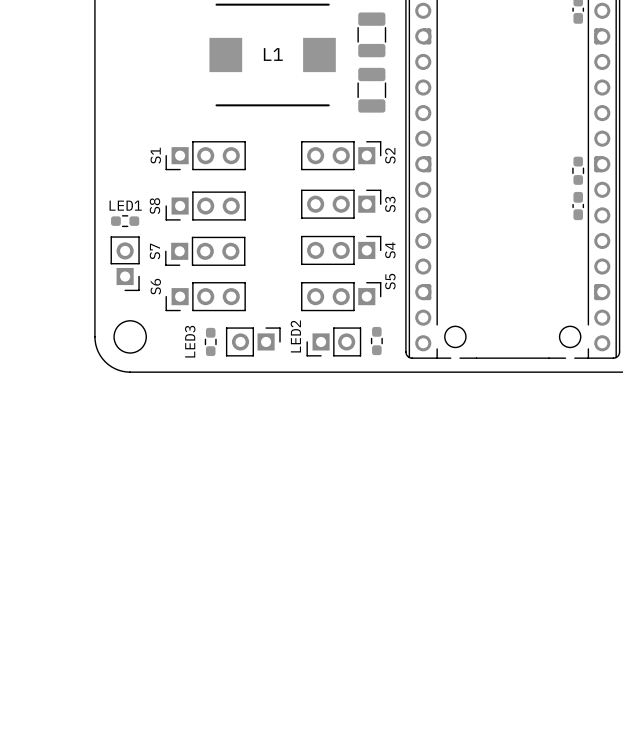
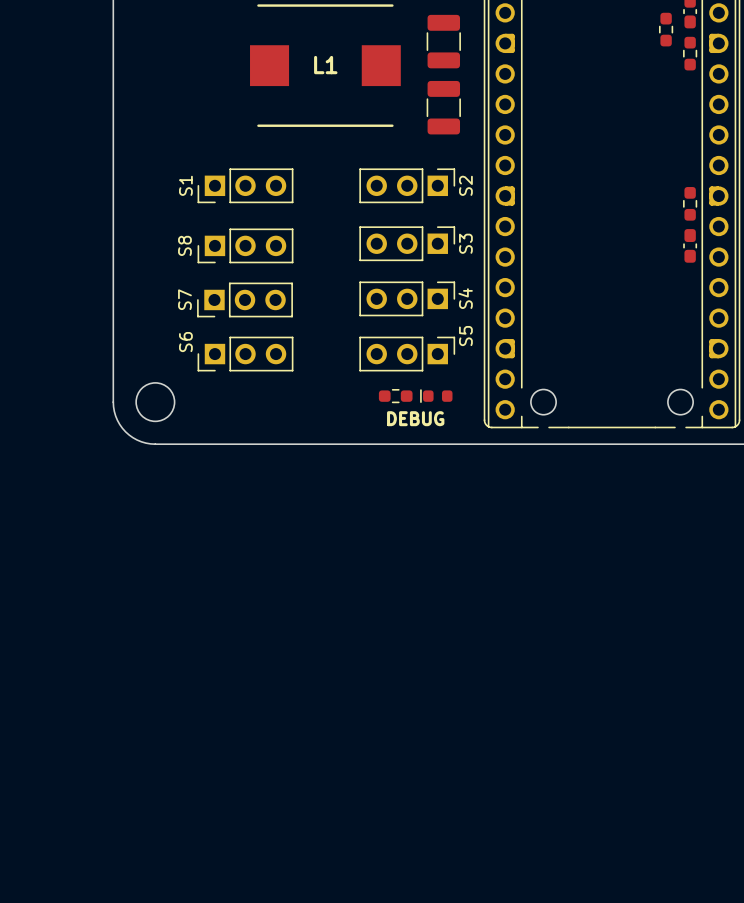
part: none -> (666, 29)
part: none -> (690, 53)
part: (125, 221) -> none
LED1: (125, 263) -> none
part: none -> (436, 396)
part: (210, 341) -> none
LED3: (253, 341) -> none
LED2: (333, 341) -> none
part rotation: 0° (376, 341) -> 90° clockwise (395, 396)
part position: (376, 341) -> (395, 396)
text: none -> DEBUG (415, 418)

